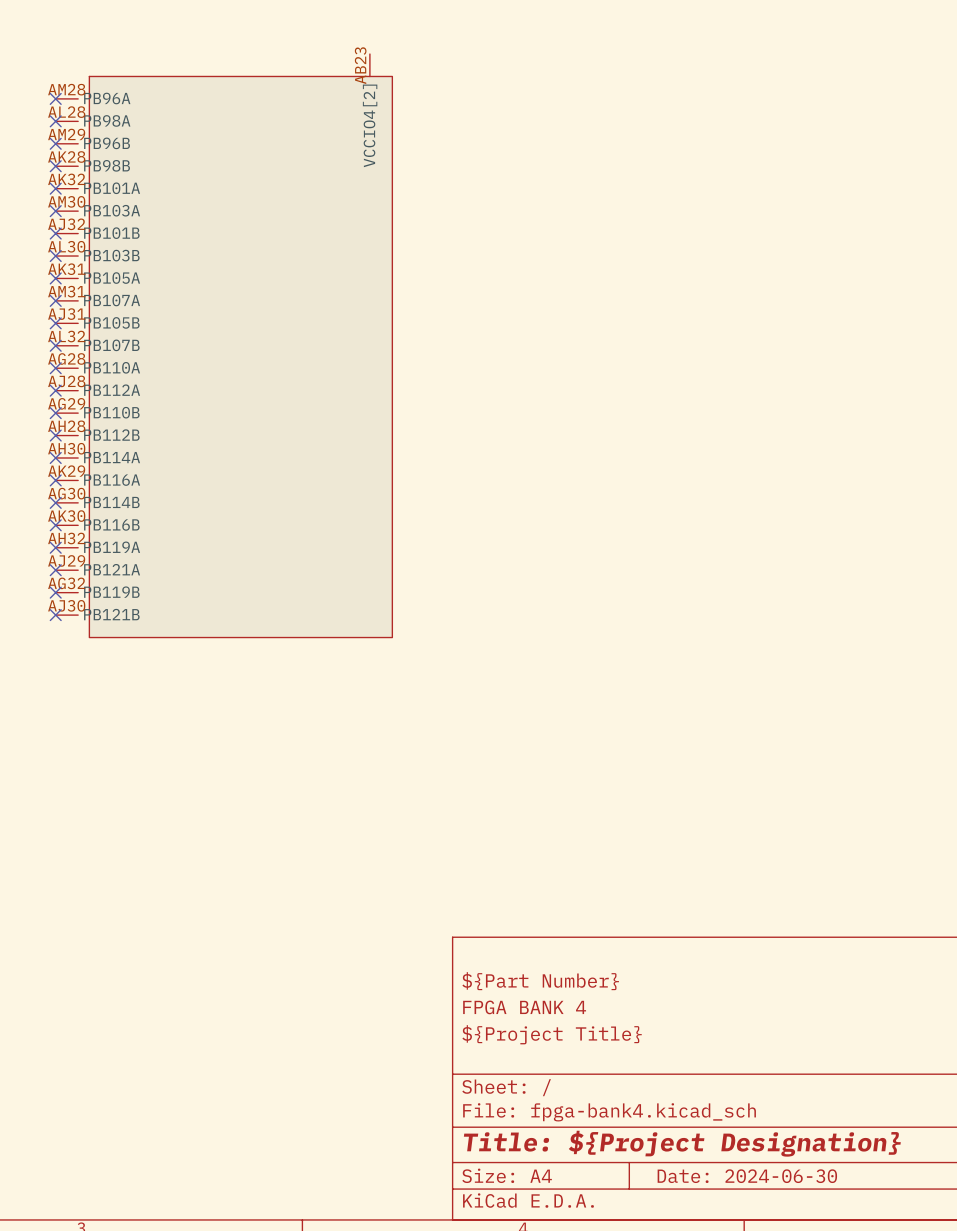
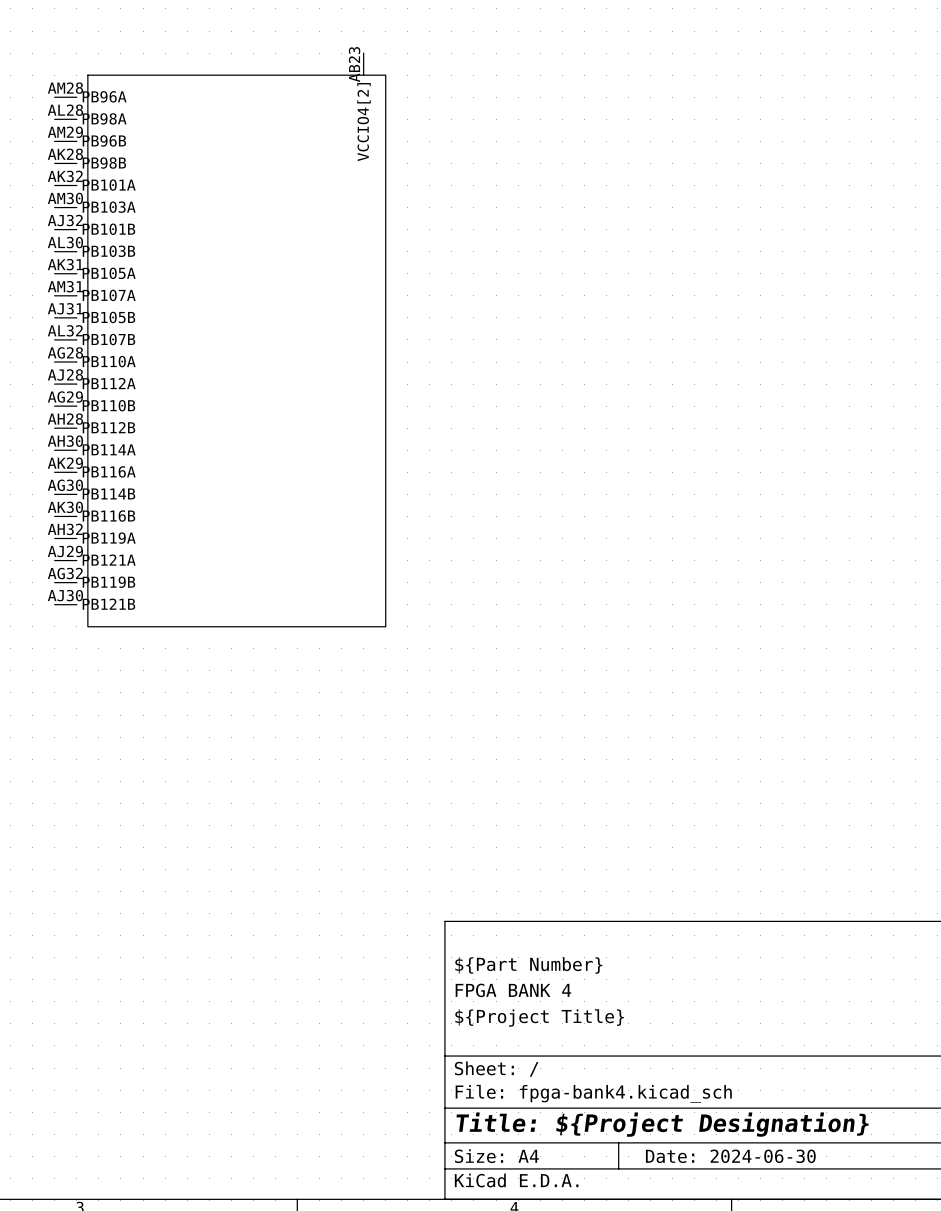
no-connect mark: (55, 98) -> none
no-connect mark: (55, 121) -> none
no-connect mark: (55, 143) -> none
no-connect mark: (55, 166) -> none
no-connect mark: (55, 188) -> none
no-connect mark: (55, 211) -> none
no-connect mark: (55, 233) -> none
no-connect mark: (55, 256) -> none
no-connect mark: (55, 278) -> none
no-connect mark: (55, 300) -> none
no-connect mark: (55, 323) -> none
no-connect mark: (55, 345) -> none
no-connect mark: (55, 368) -> none
no-connect mark: (55, 390) -> none
no-connect mark: (55, 413) -> none
no-connect mark: (55, 435) -> none
no-connect mark: (55, 457) -> none
no-connect mark: (55, 480) -> none
no-connect mark: (55, 502) -> none
no-connect mark: (55, 525) -> none
no-connect mark: (55, 547) -> none
no-connect mark: (55, 570) -> none
no-connect mark: (55, 592) -> none
no-connect mark: (55, 615) -> none

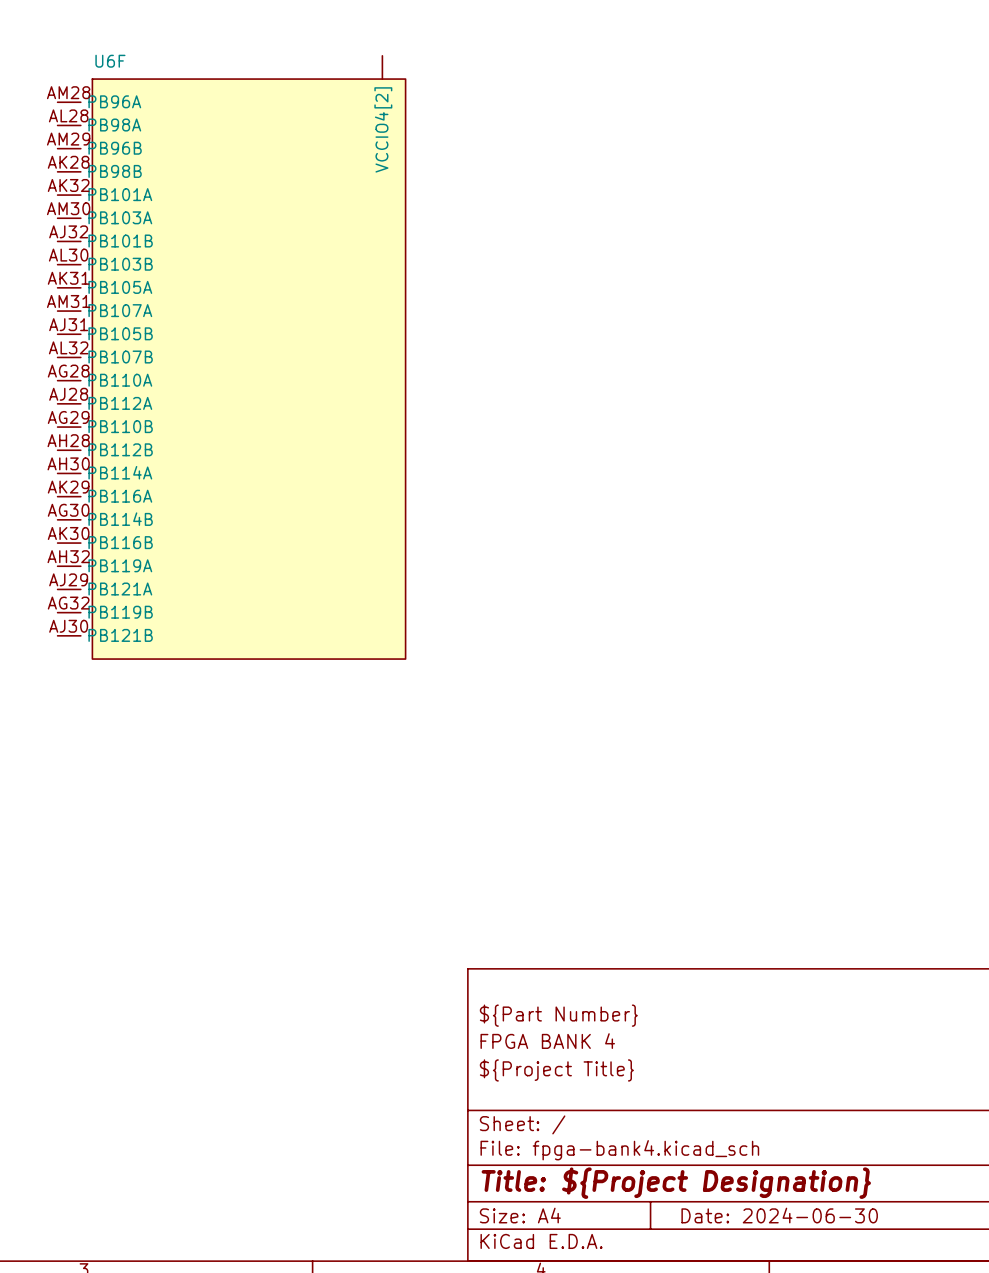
U6F name: none -> U6F (110, 61)
U6F pin number: AB23 (354, 64) -> none

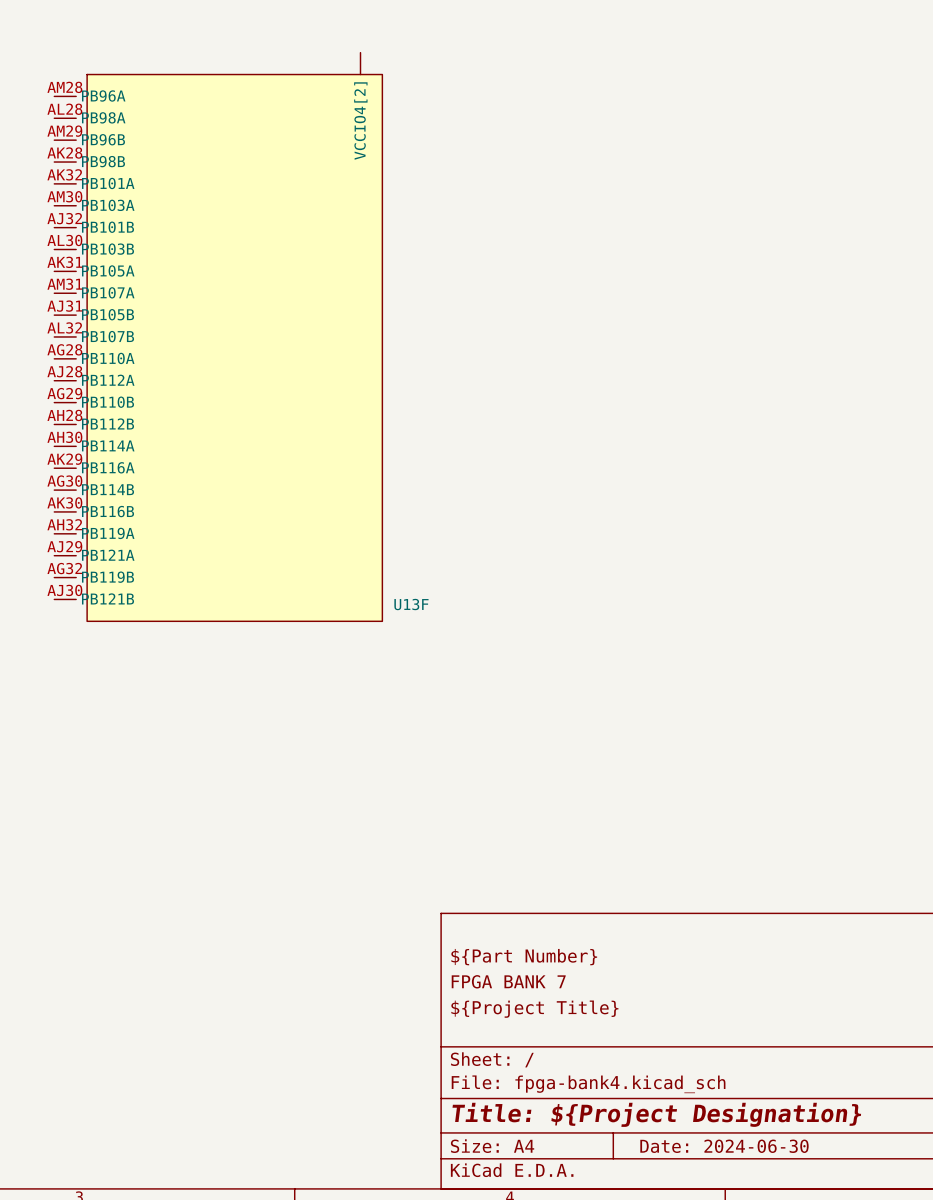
U6F name: U6F (110, 61) -> U13F (411, 604)
title block: FPGA BANK 4 (547, 1041) -> FPGA BANK 7 (508, 981)

